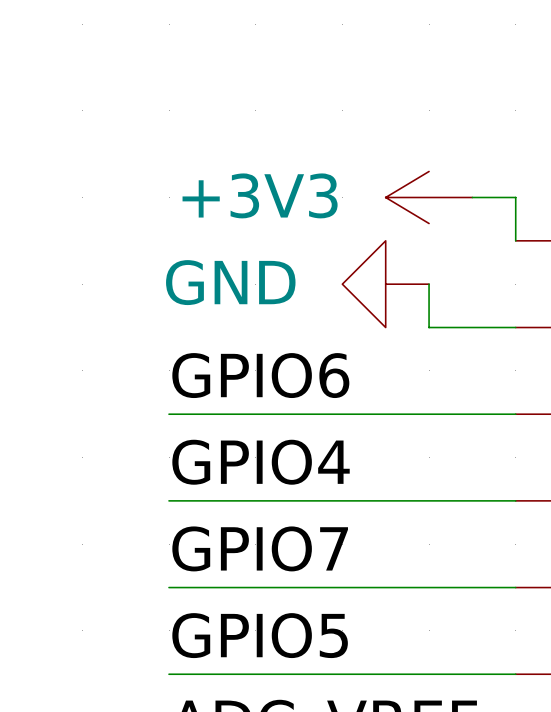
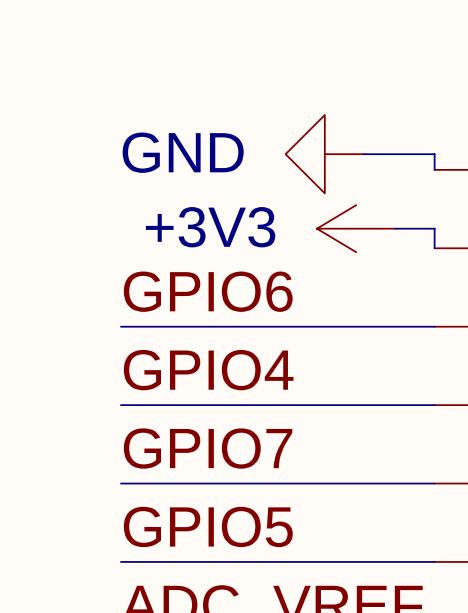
power symbol position: +3V3 (429, 197) -> +3V3 (356, 228)
wire: (472, 197) (515, 197) (515, 223) -> (364, 154) (434, 154)
power symbol position: GND (385, 284) -> GND (324, 154)
wire: (429, 284) (429, 327) (515, 327) -> (395, 228) (434, 228) (434, 248)

